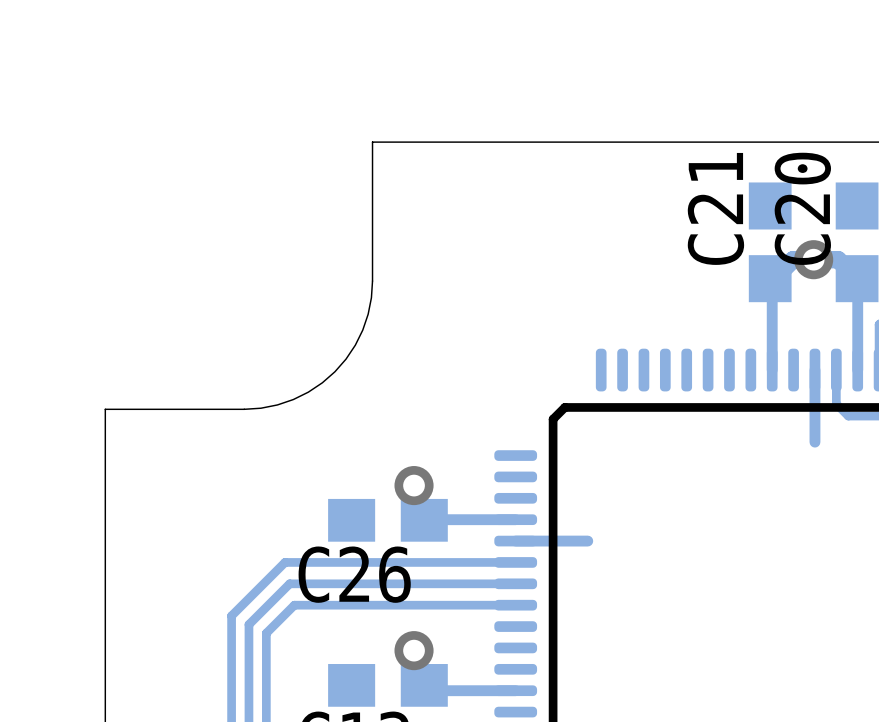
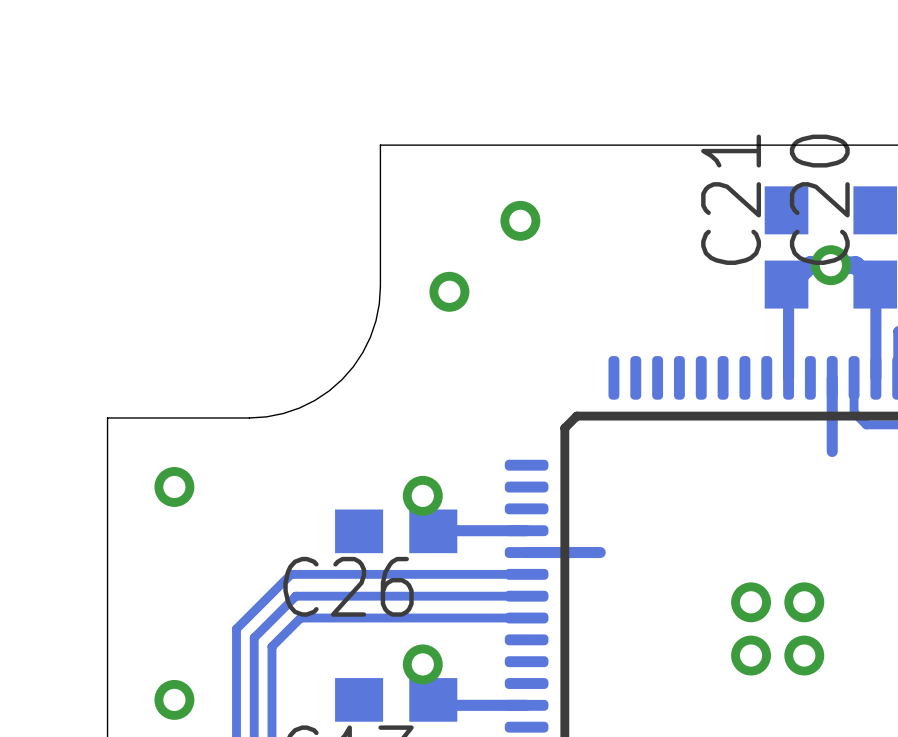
via: none -> (520, 220)
via: none -> (449, 291)
via: none -> (174, 486)
via: none -> (751, 602)
via: none -> (804, 602)
via: none -> (751, 655)
via: none -> (804, 655)
via: none -> (174, 699)

